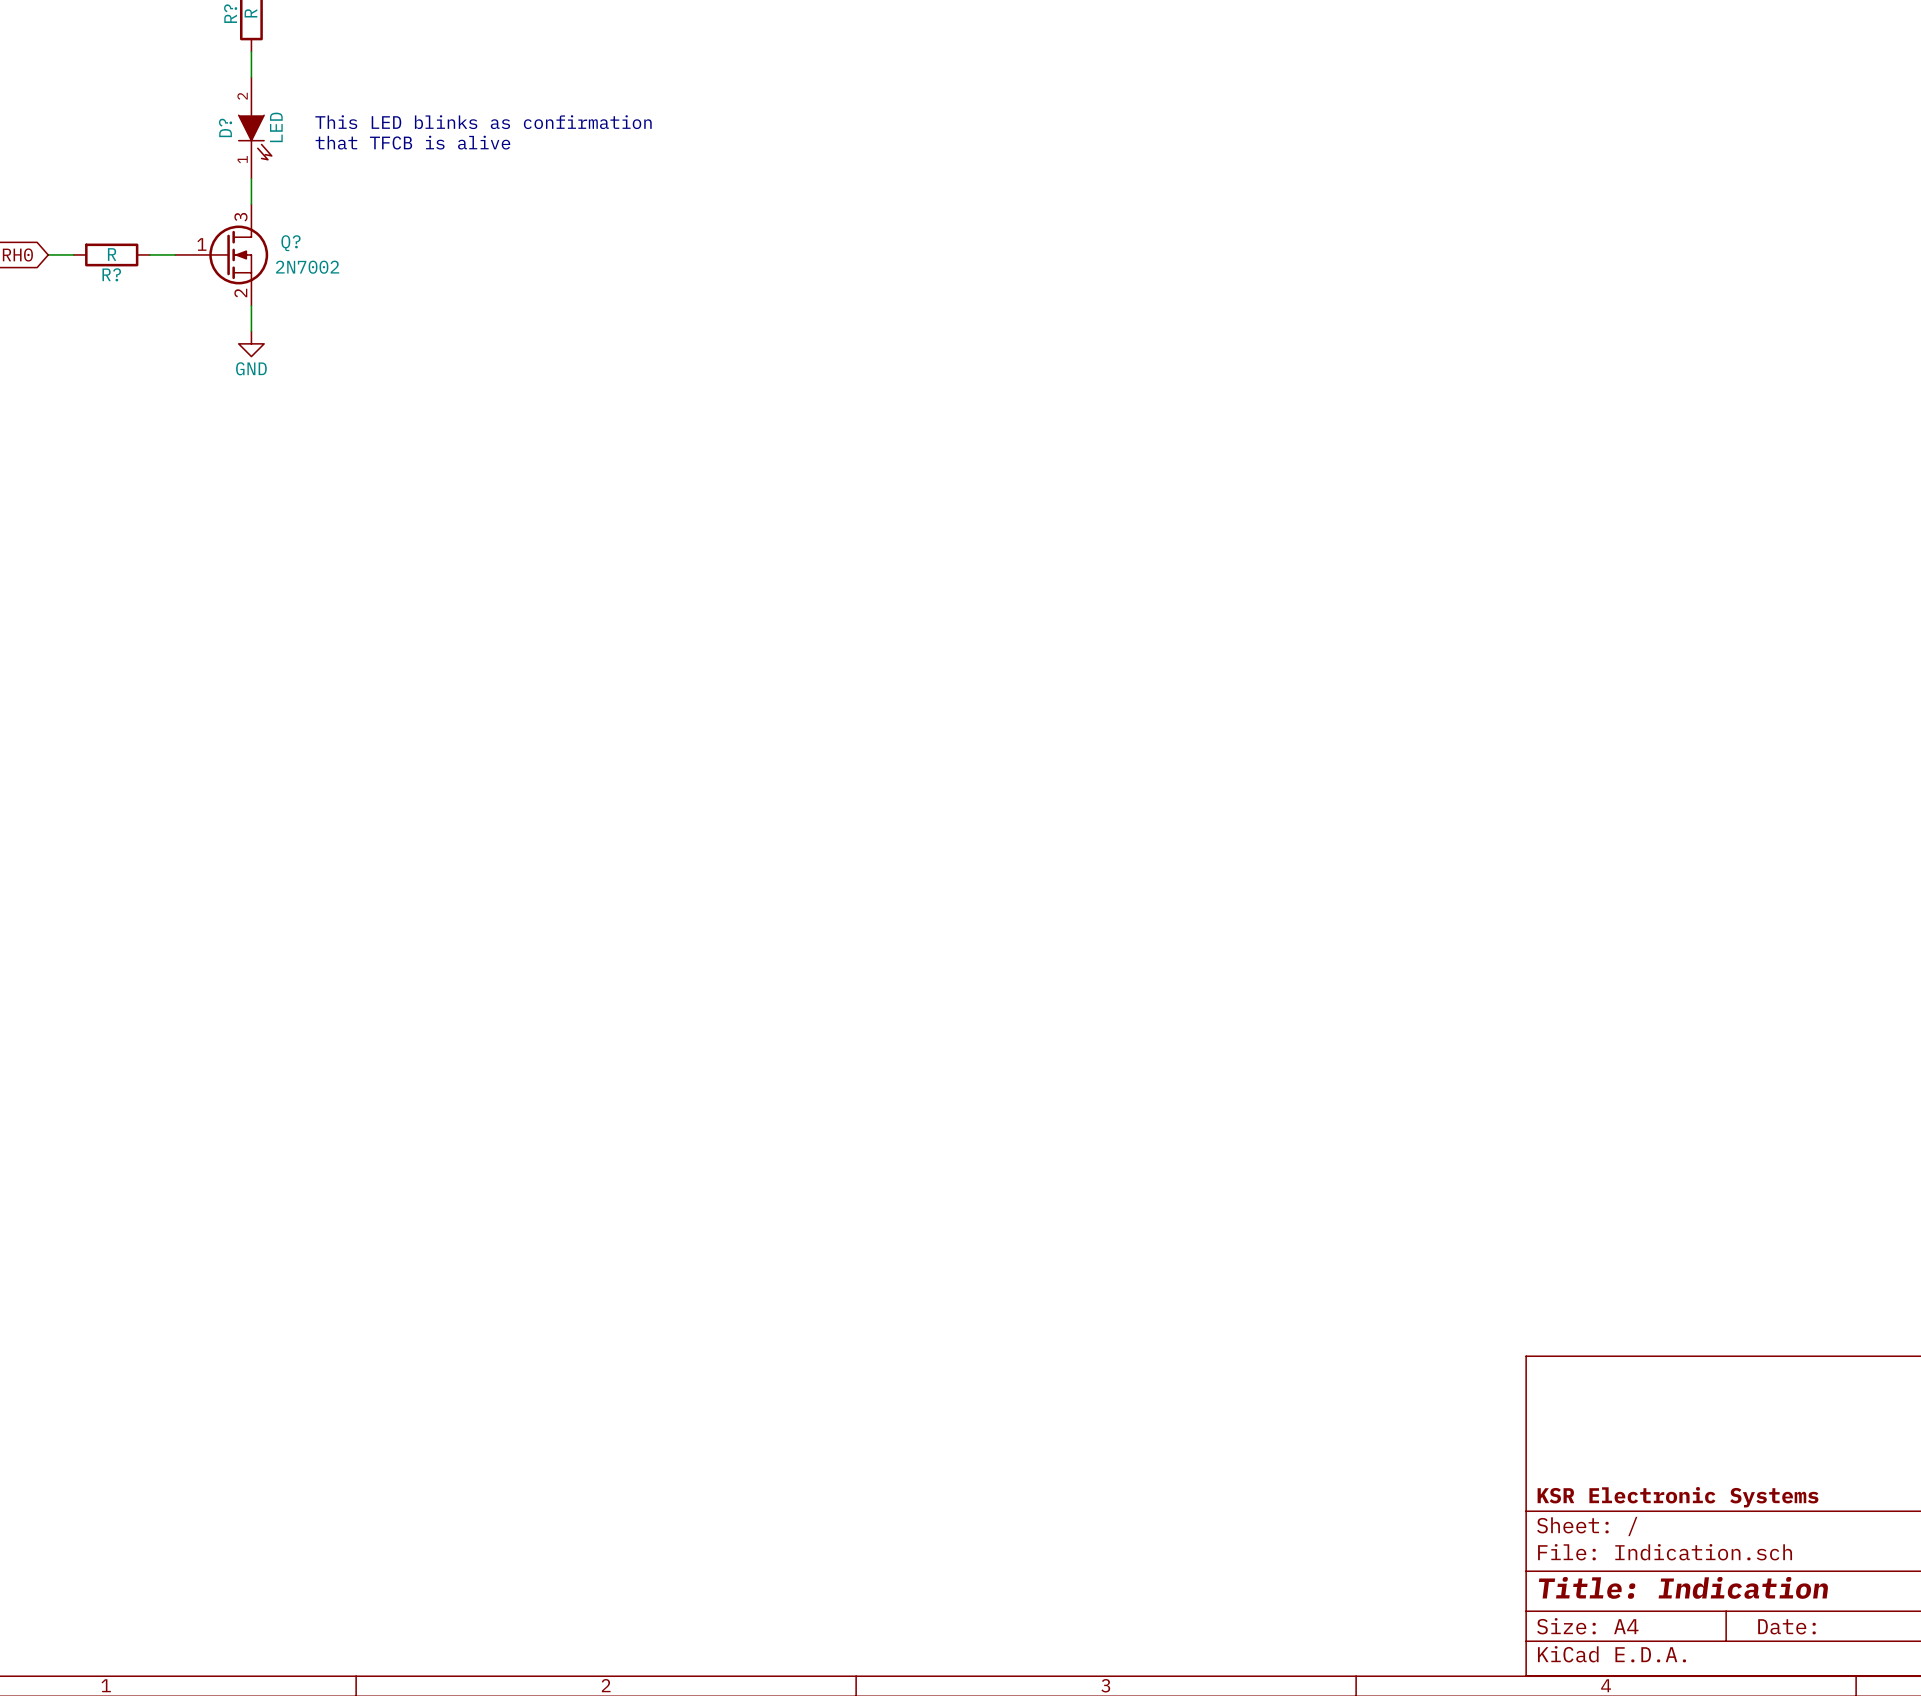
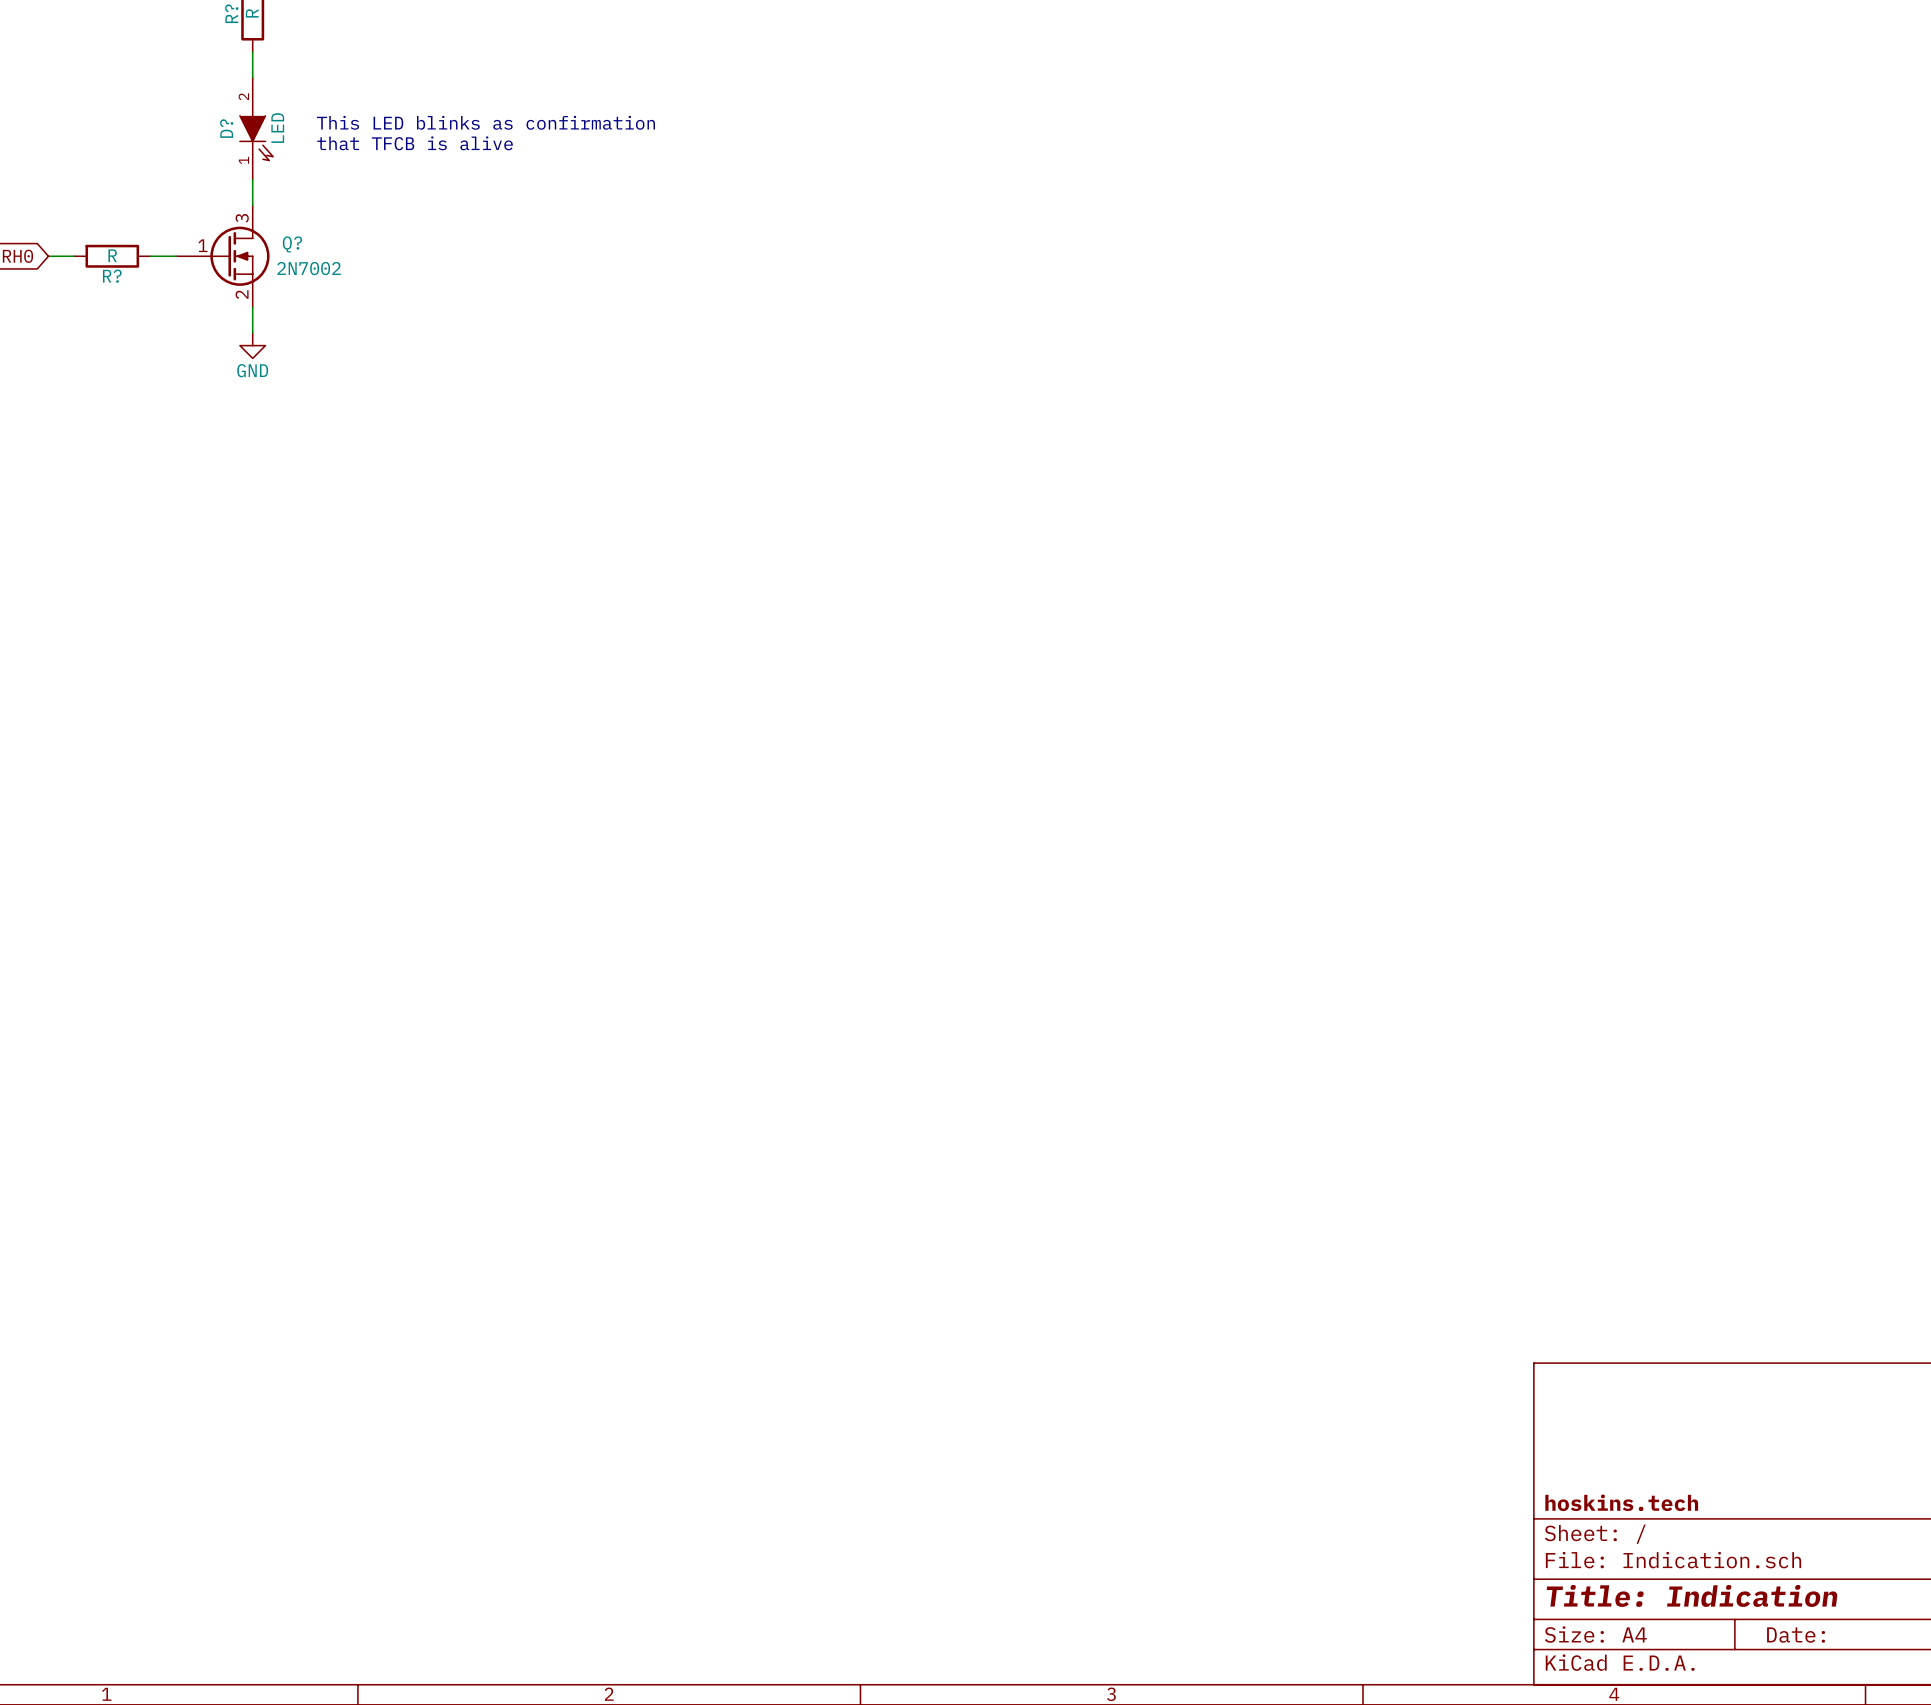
title block: KSR Electronic Systems (1677, 1497) -> hoskins.tech (1621, 1502)

